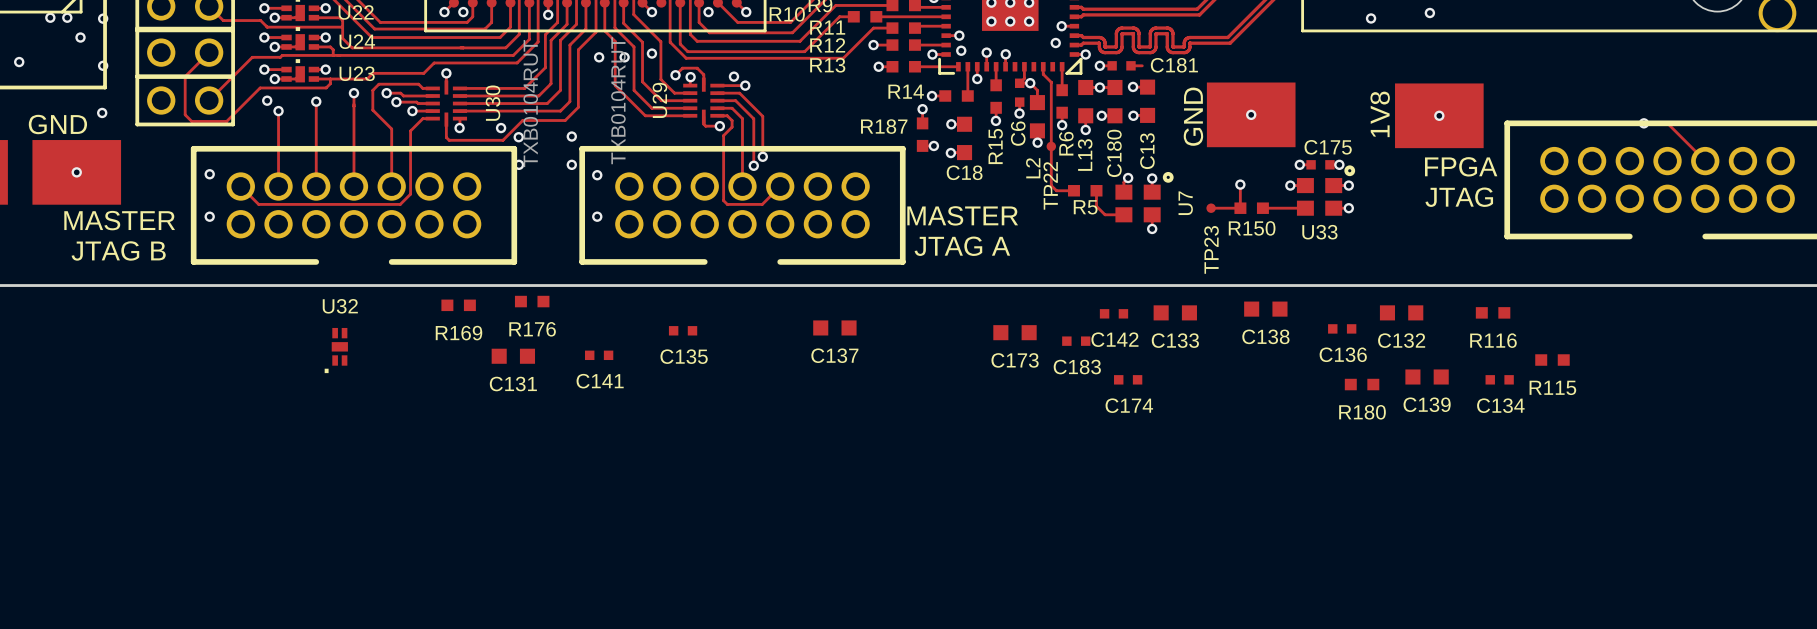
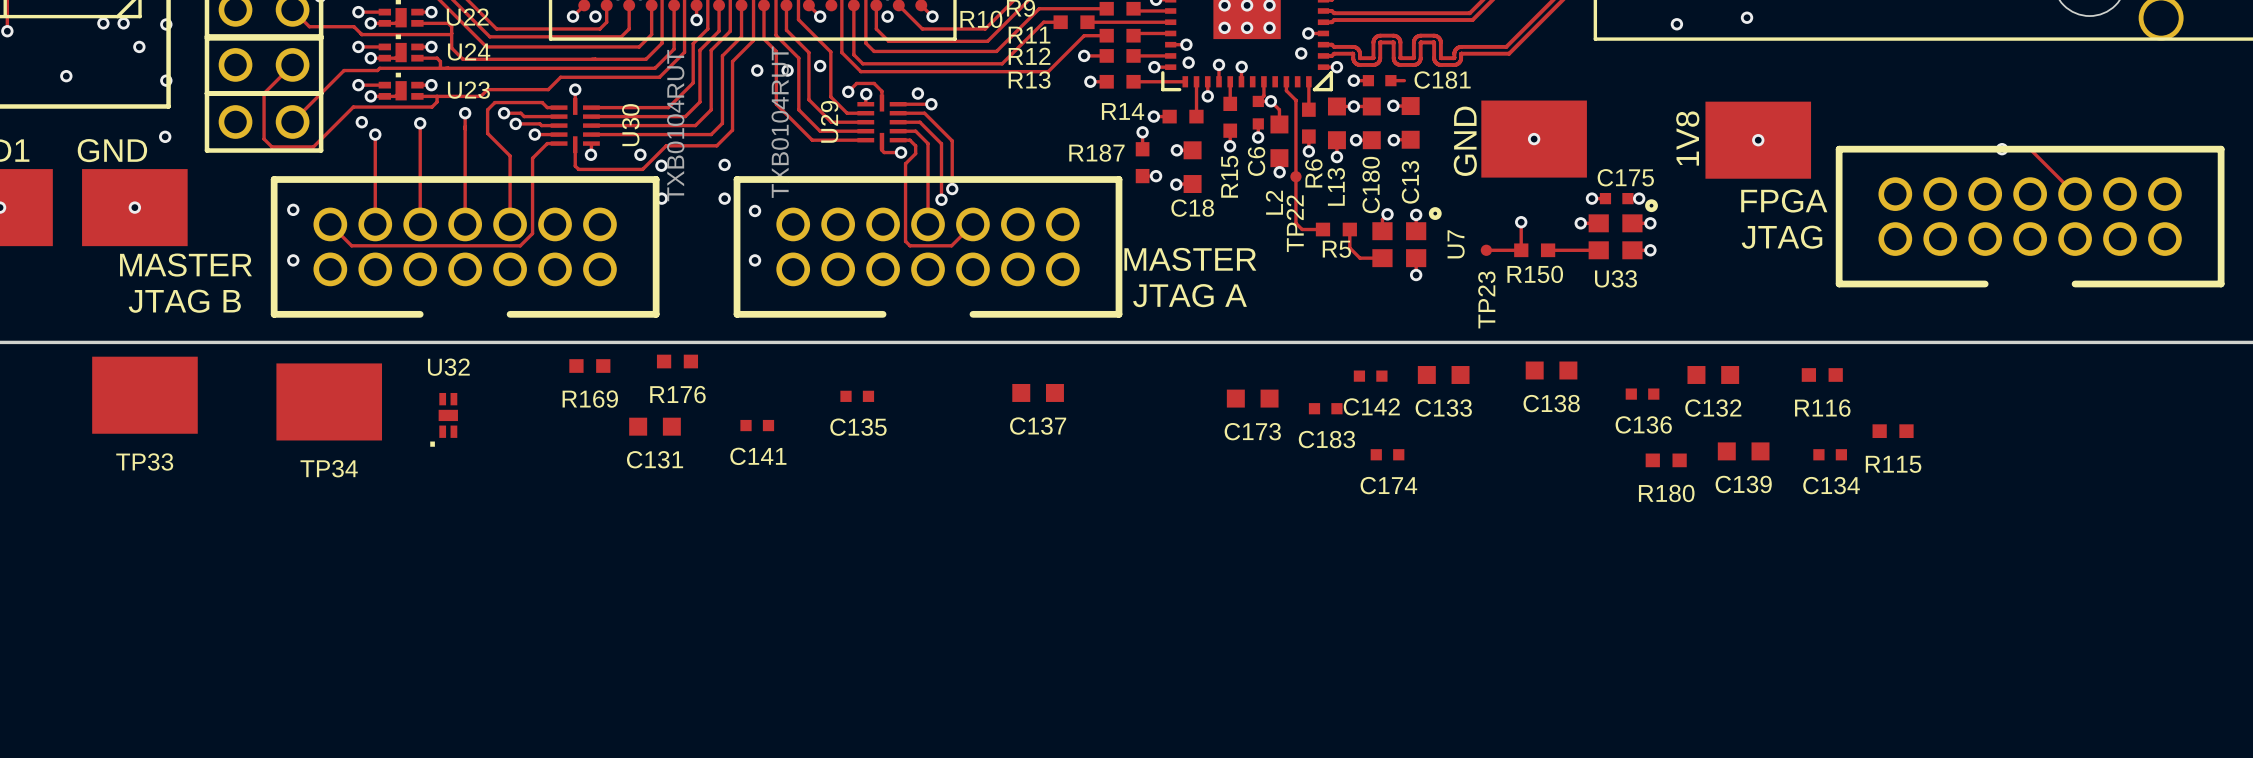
TP33: none -> (144, 395)
TP34: none -> (329, 401)

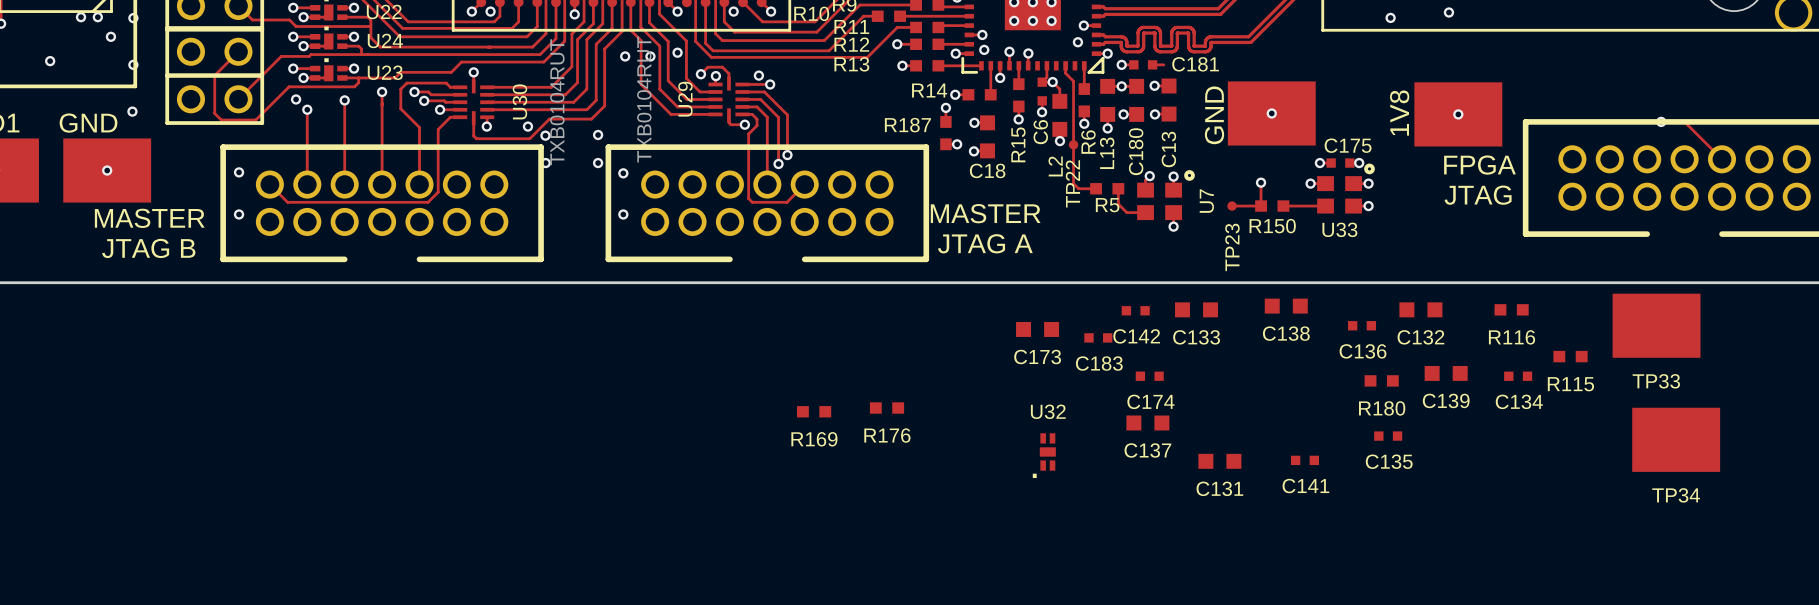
R176 position: (677, 361) -> (887, 408)
R169 position: (589, 366) -> (814, 411)
C137 position: (1038, 392) -> (1147, 422)
TP33 position: (144, 395) -> (1656, 325)
C135 position: (857, 396) -> (1388, 436)
TP34 position: (329, 401) -> (1676, 439)
U32 position: (448, 415) -> (1047, 451)
C141 position: (757, 425) -> (1304, 460)
C131 position: (655, 426) -> (1219, 461)

